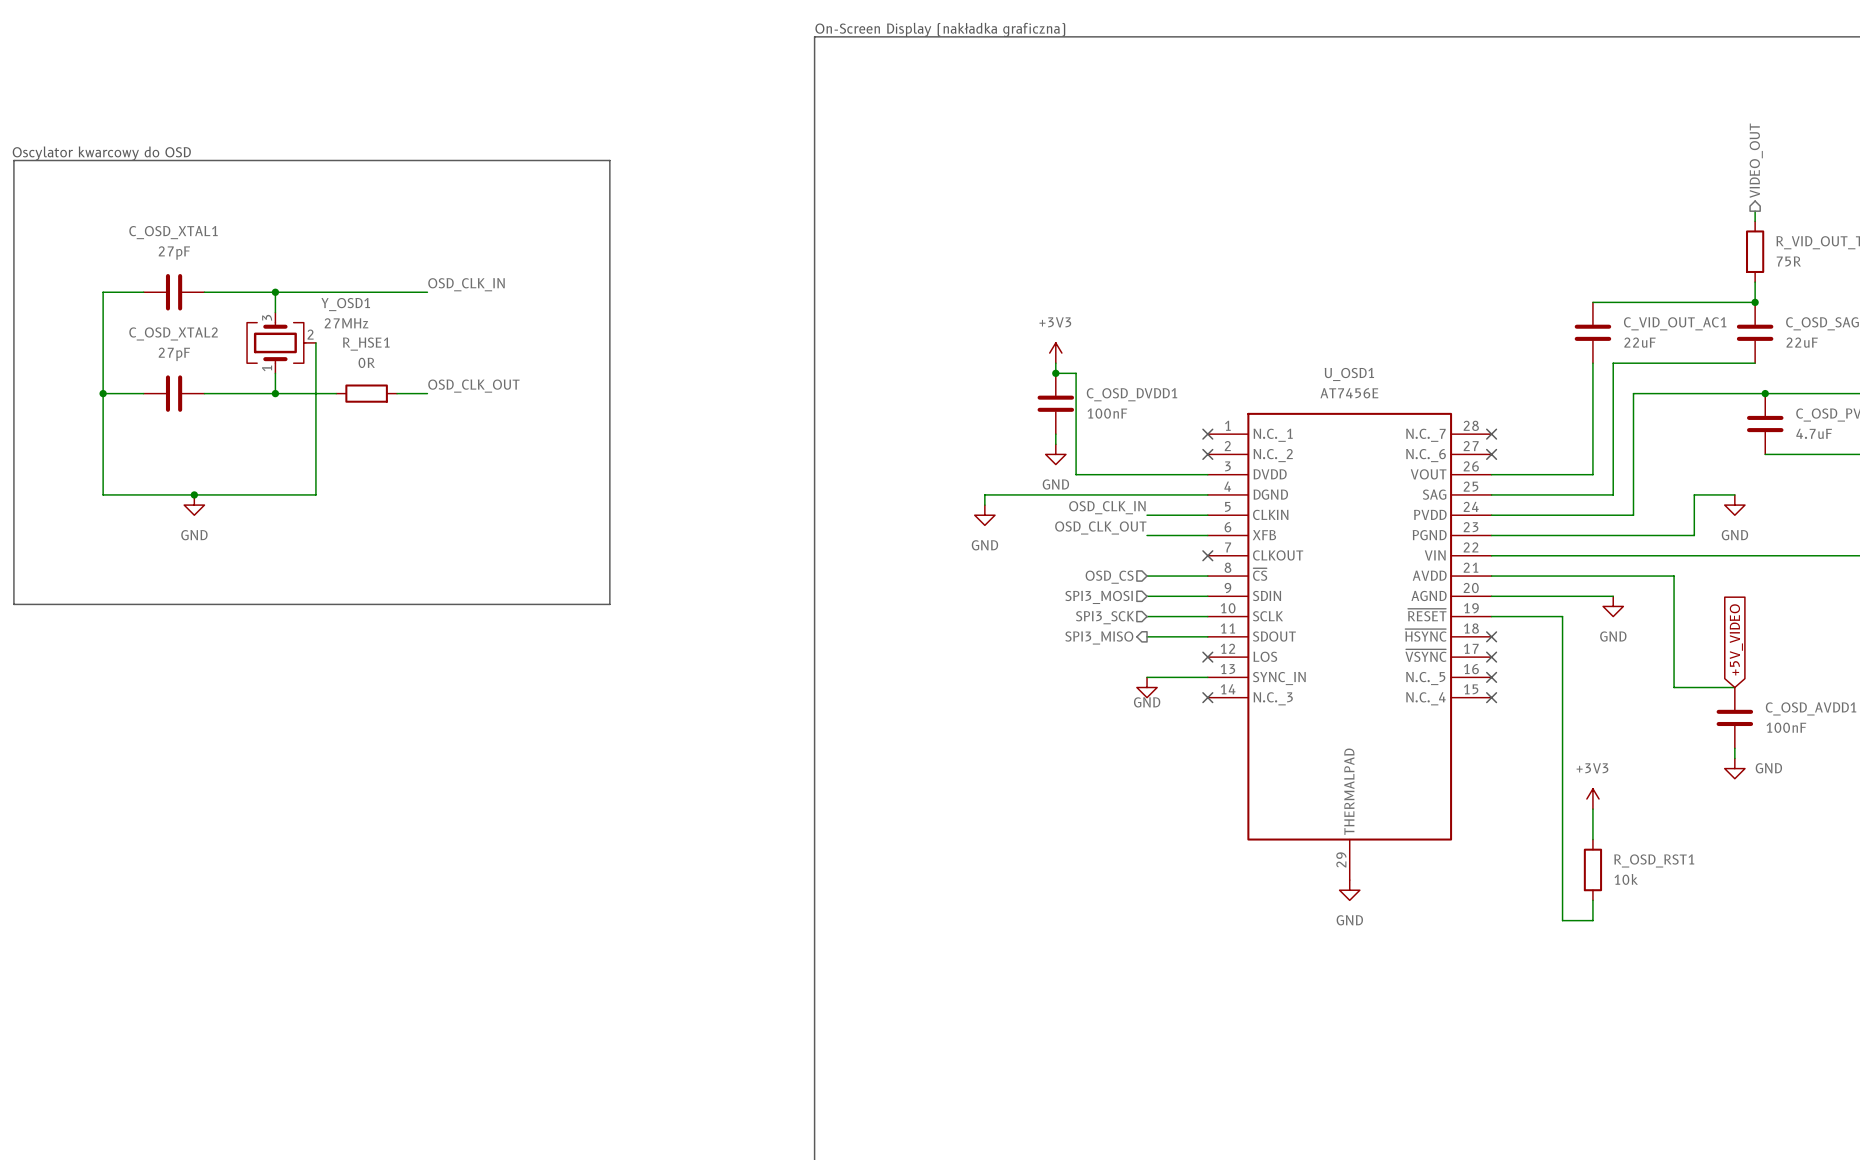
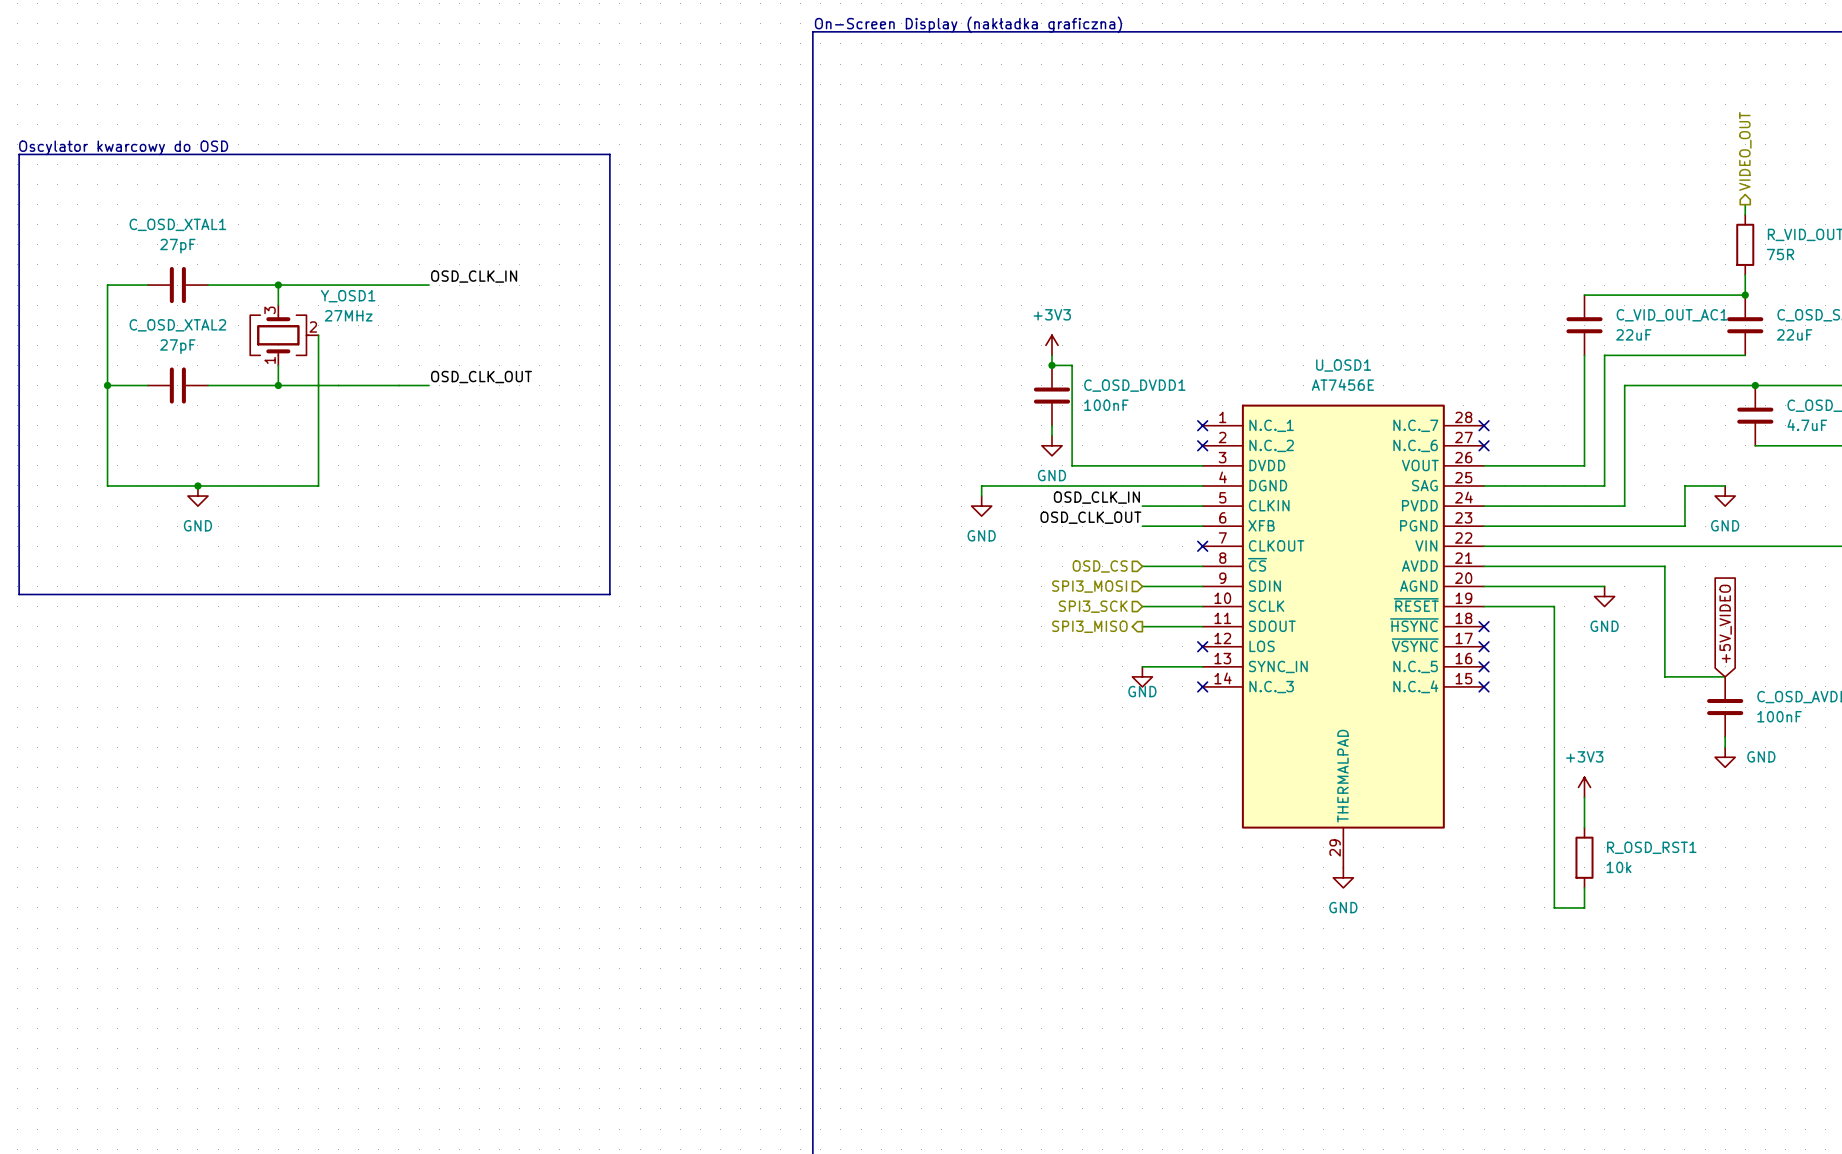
wire: none -> (338, 385) (398, 385)
R_HSE1: 0R (366, 393) -> none

